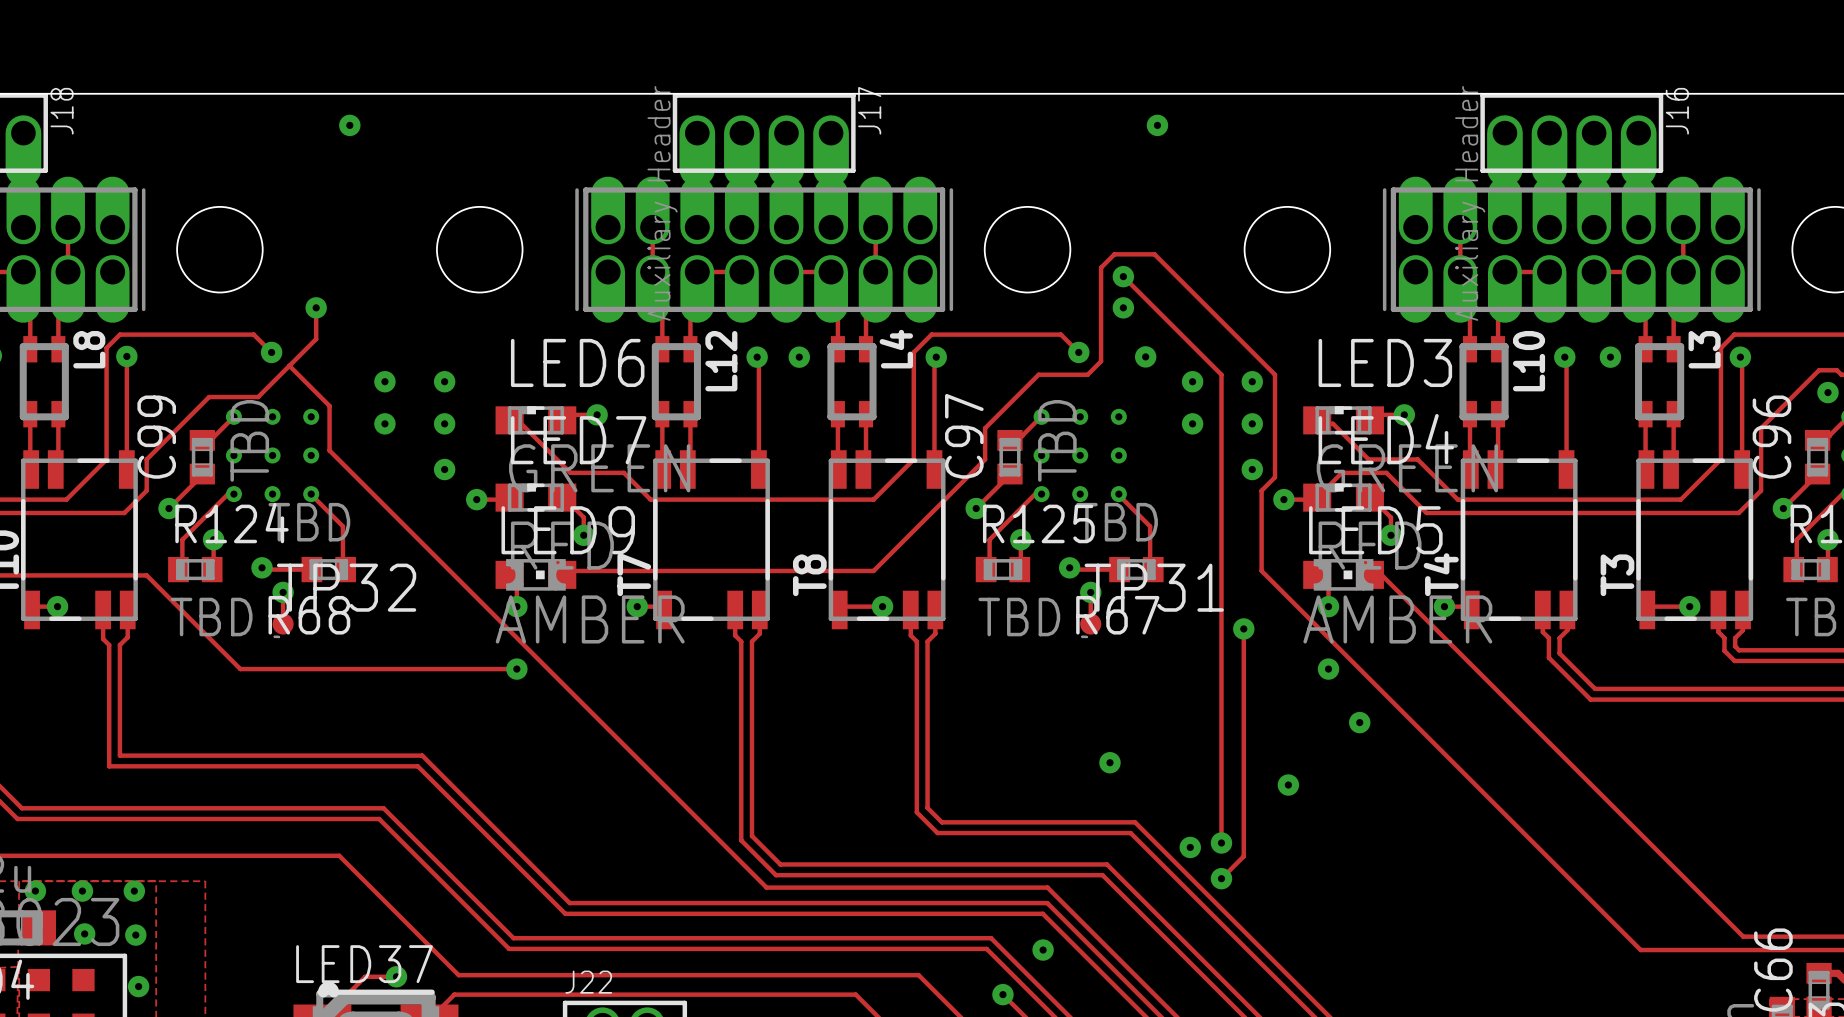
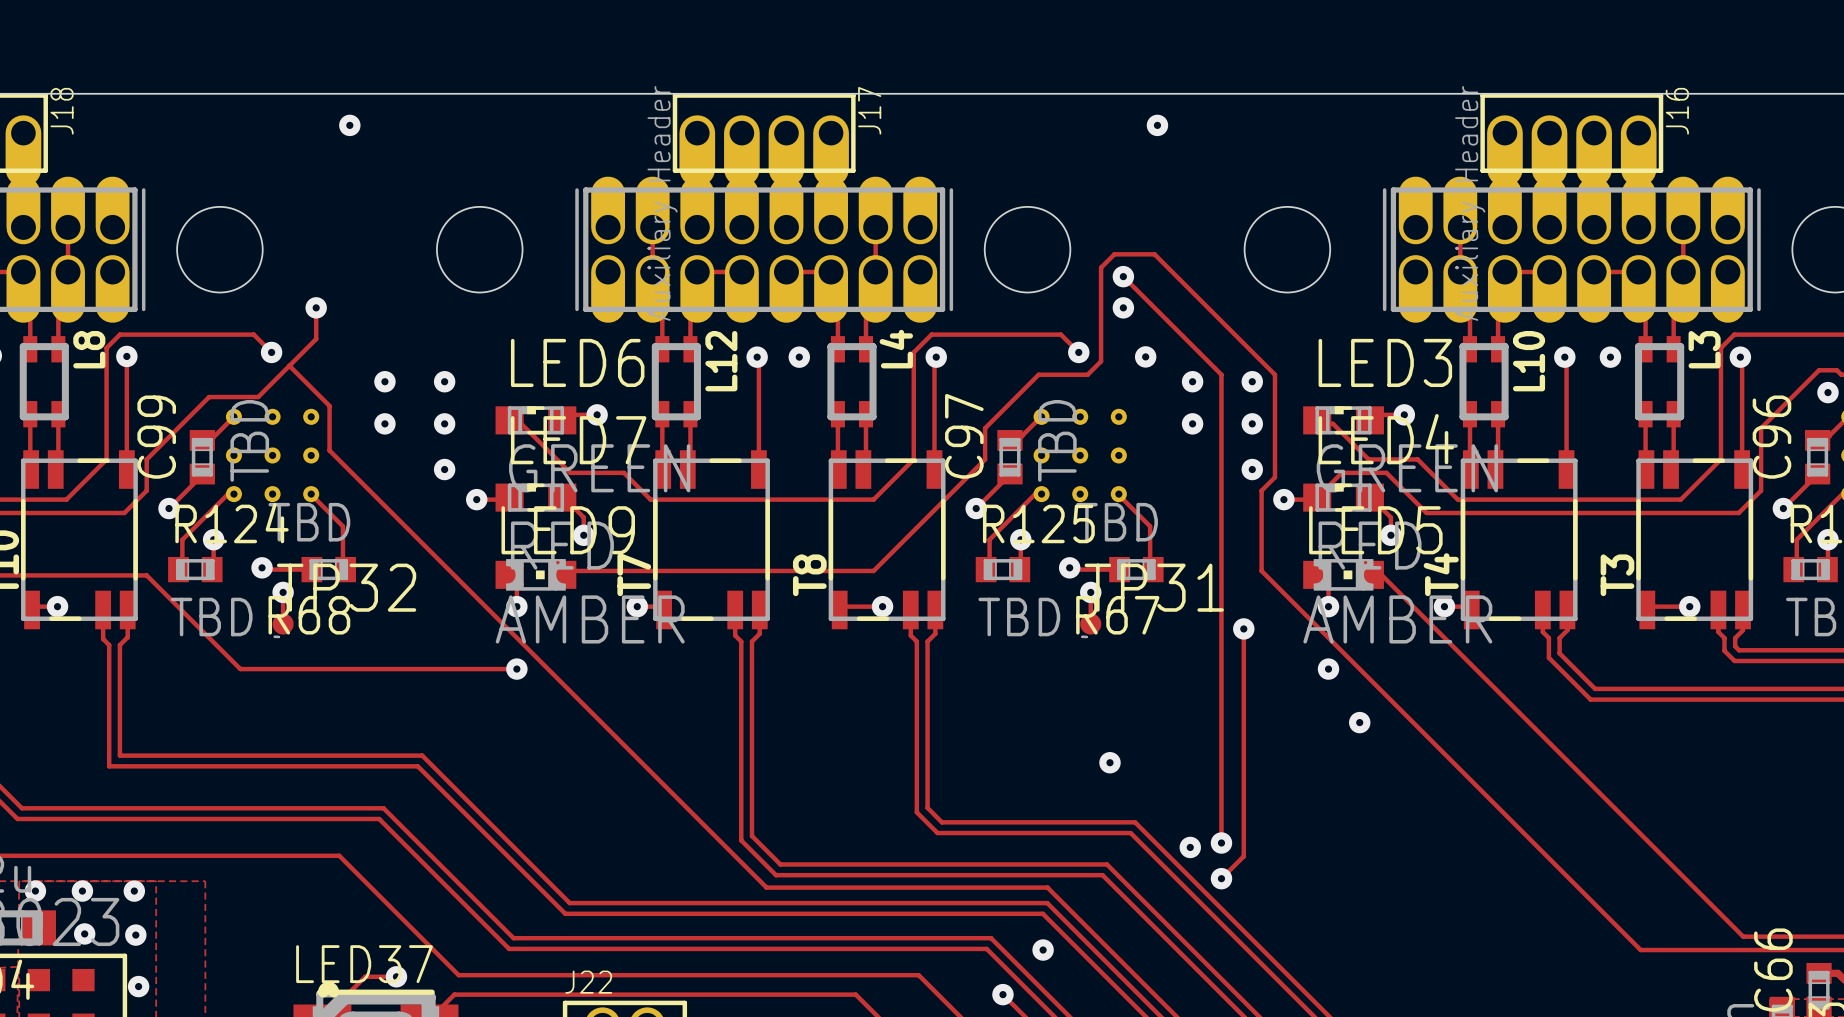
via: (1288, 785) -> none

